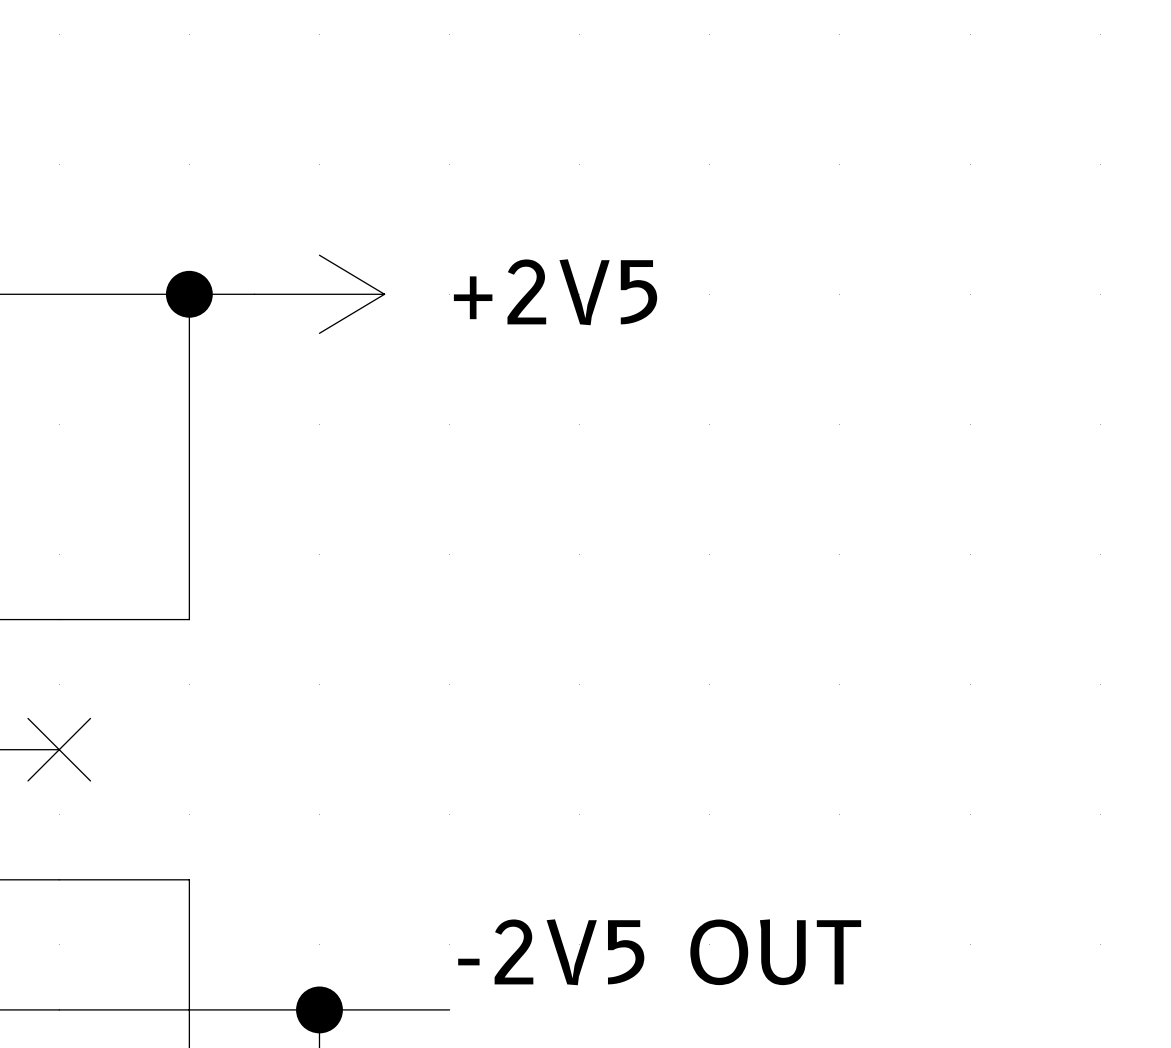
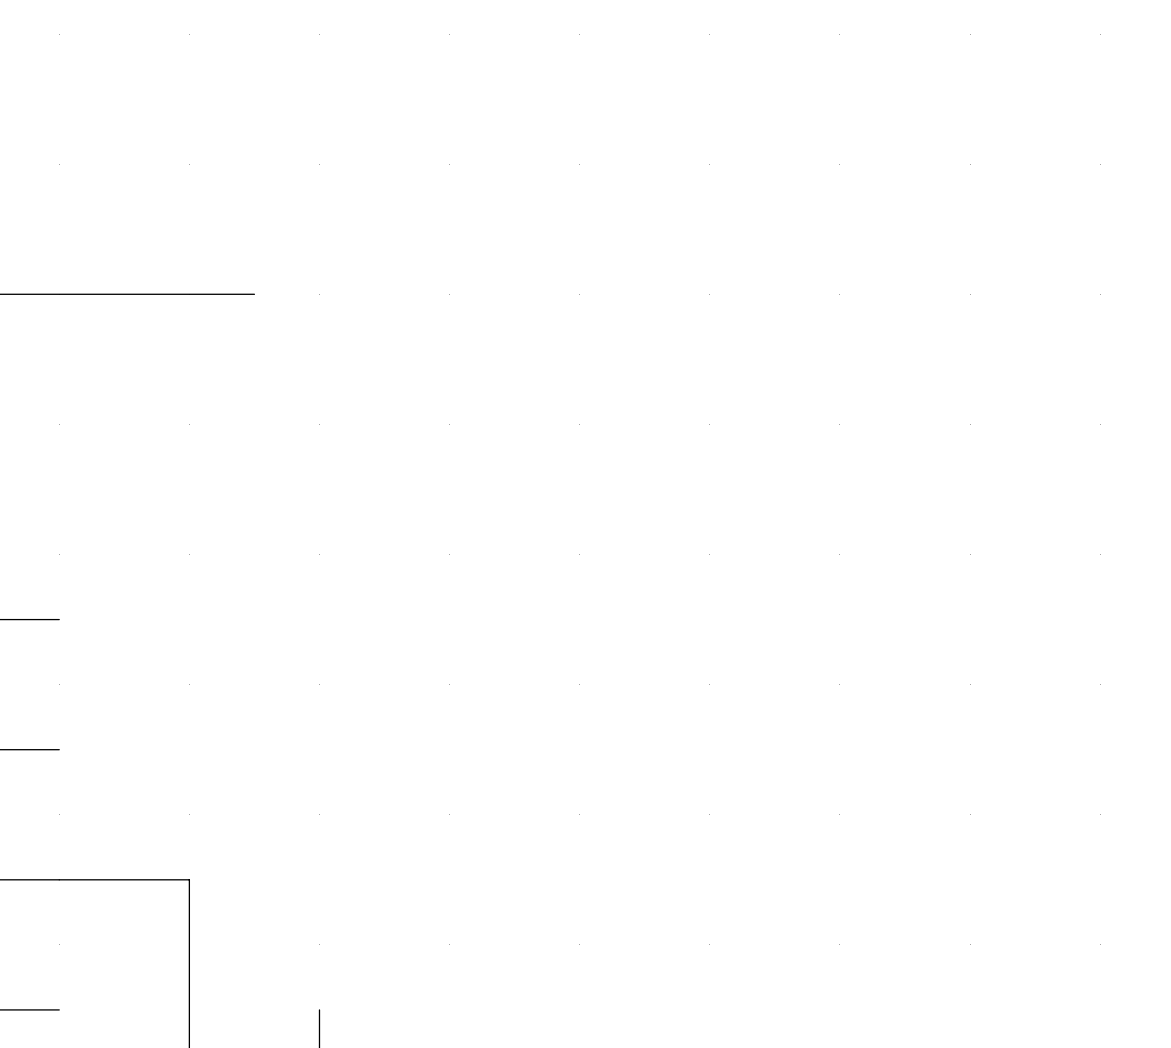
wire: (189, 294) (189, 619) (59, 619) -> none
junction: (189, 294) -> none
power symbol: +2V5 (319, 294) -> none
no-connect mark: (59, 749) -> none
label: -2V5 OUT (659, 952) -> none
wire: (59, 1009) (449, 1009) -> none
junction: (319, 1009) -> none

